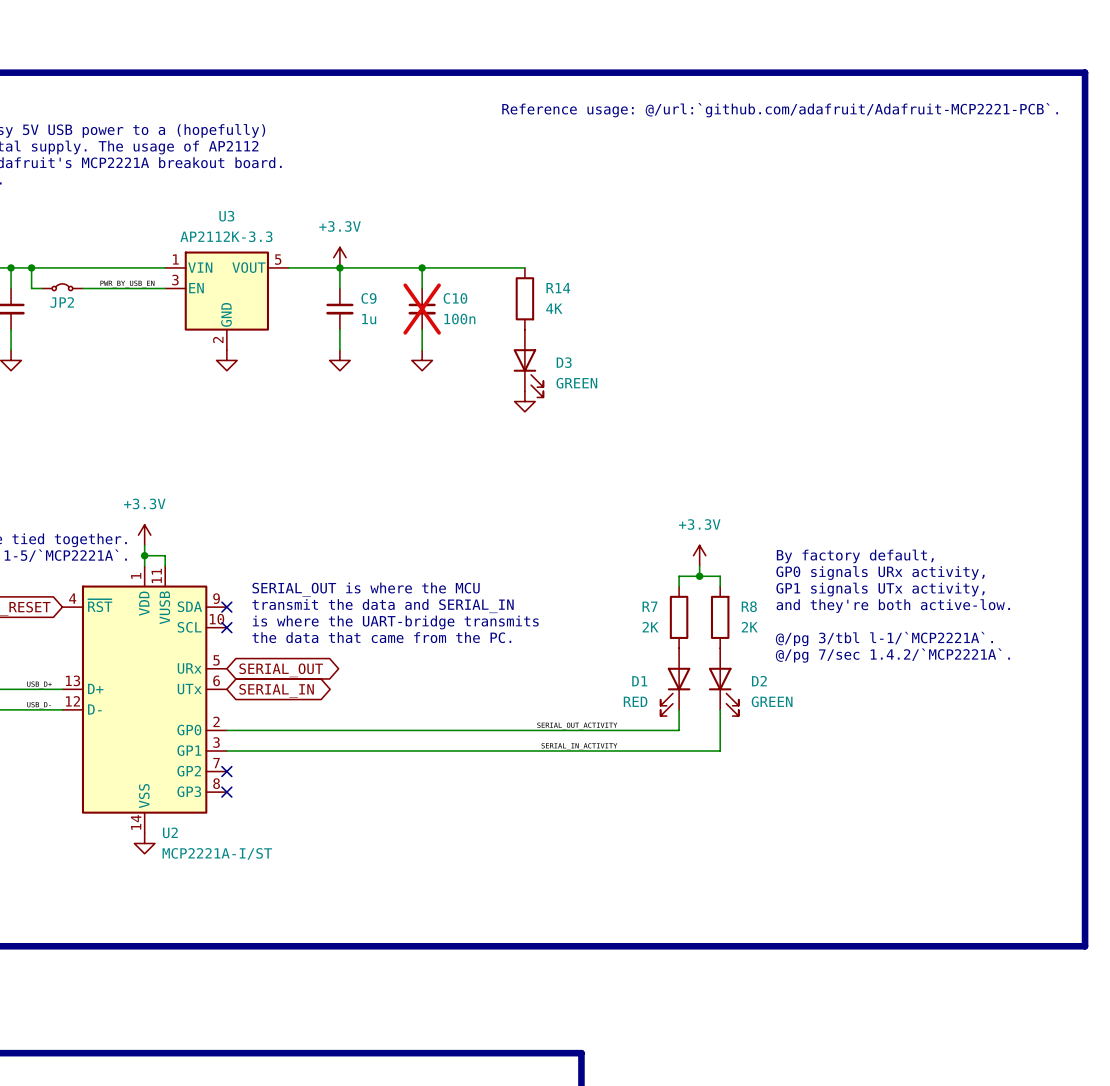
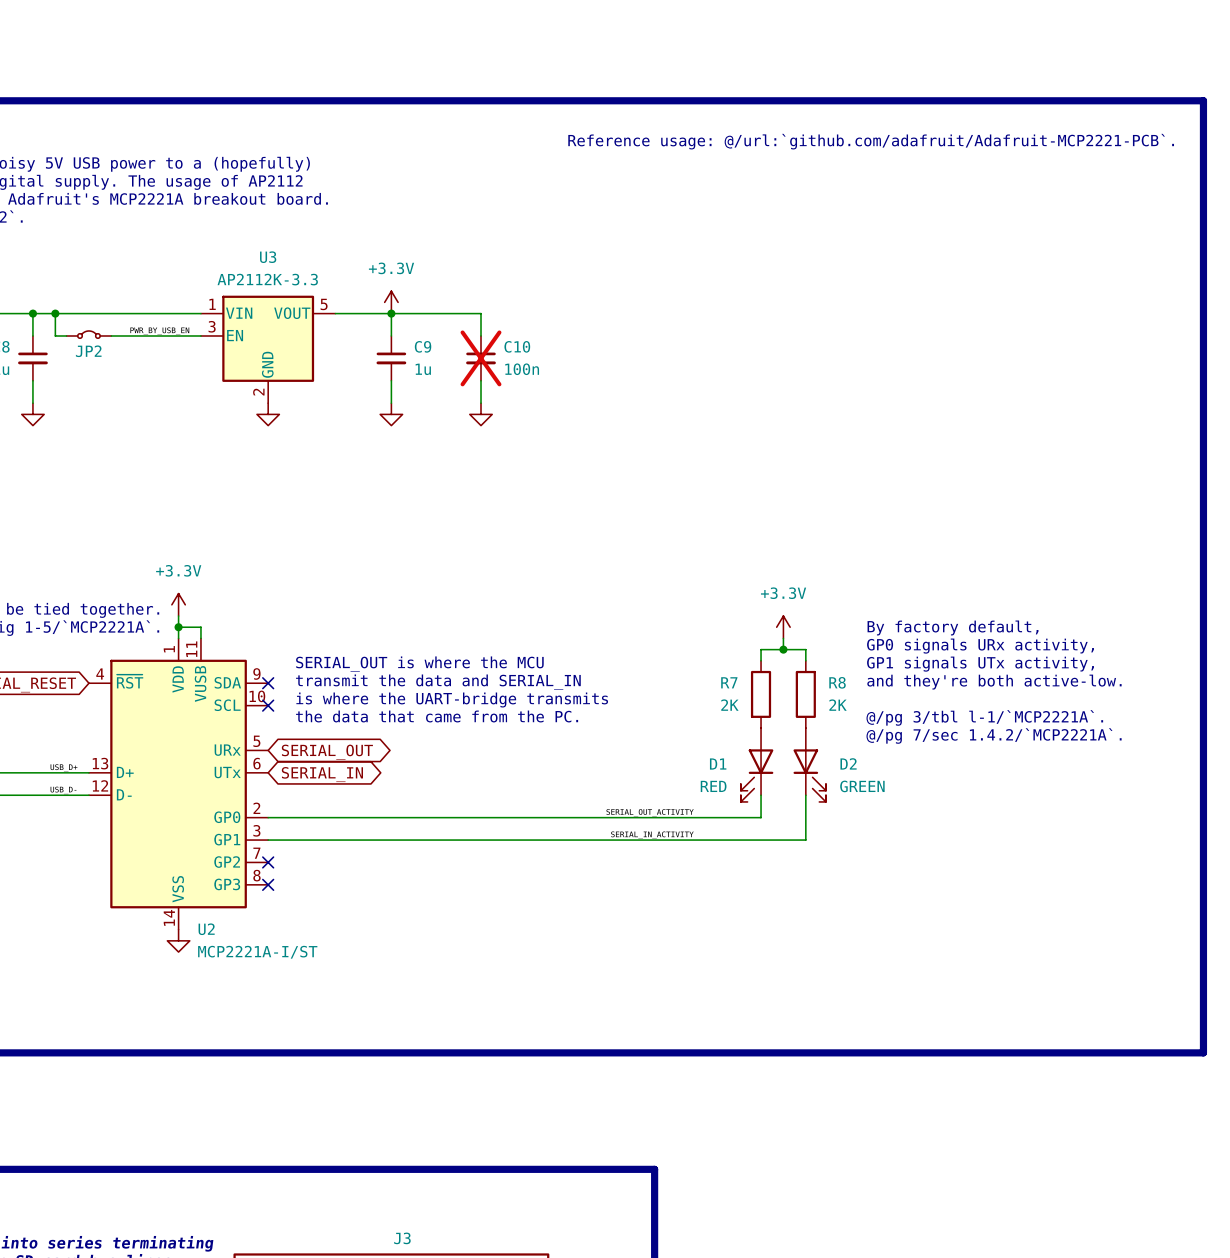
wire: (422, 267) (524, 267) -> none
junction: (422, 267) -> none
R14: 4K (524, 298) -> none
D3: GREEN (528, 363) -> none
power symbol: (524, 401) -> none

